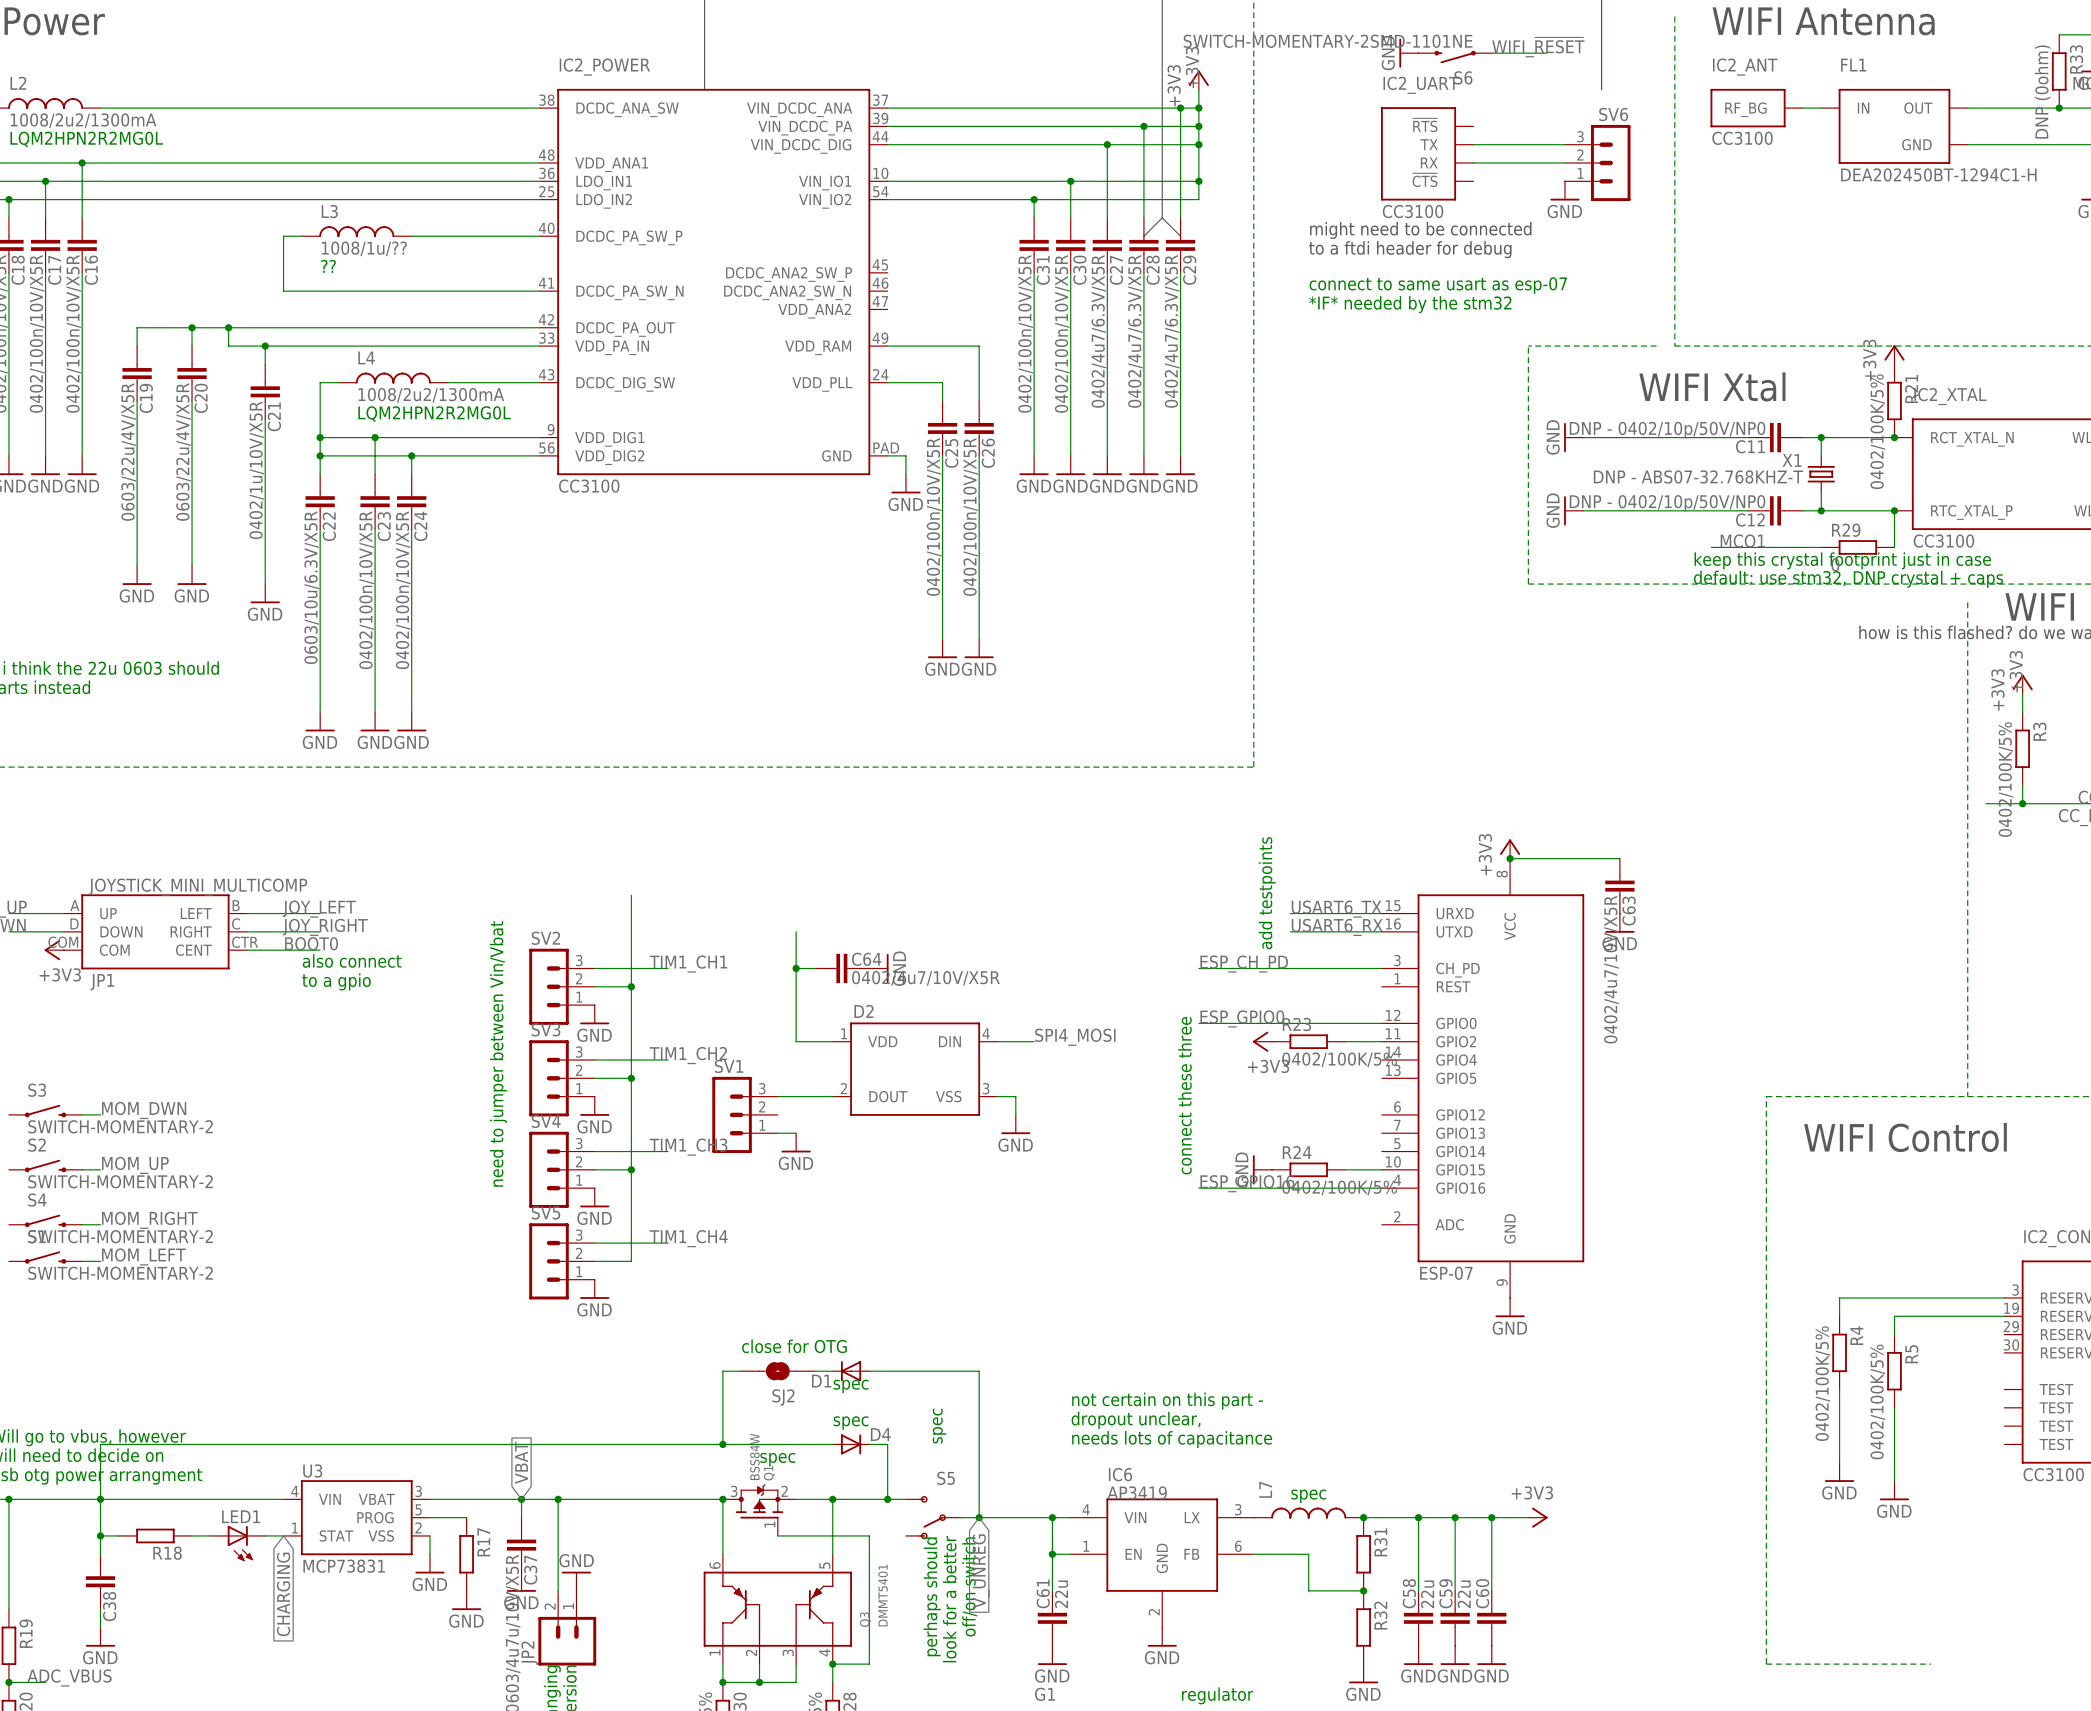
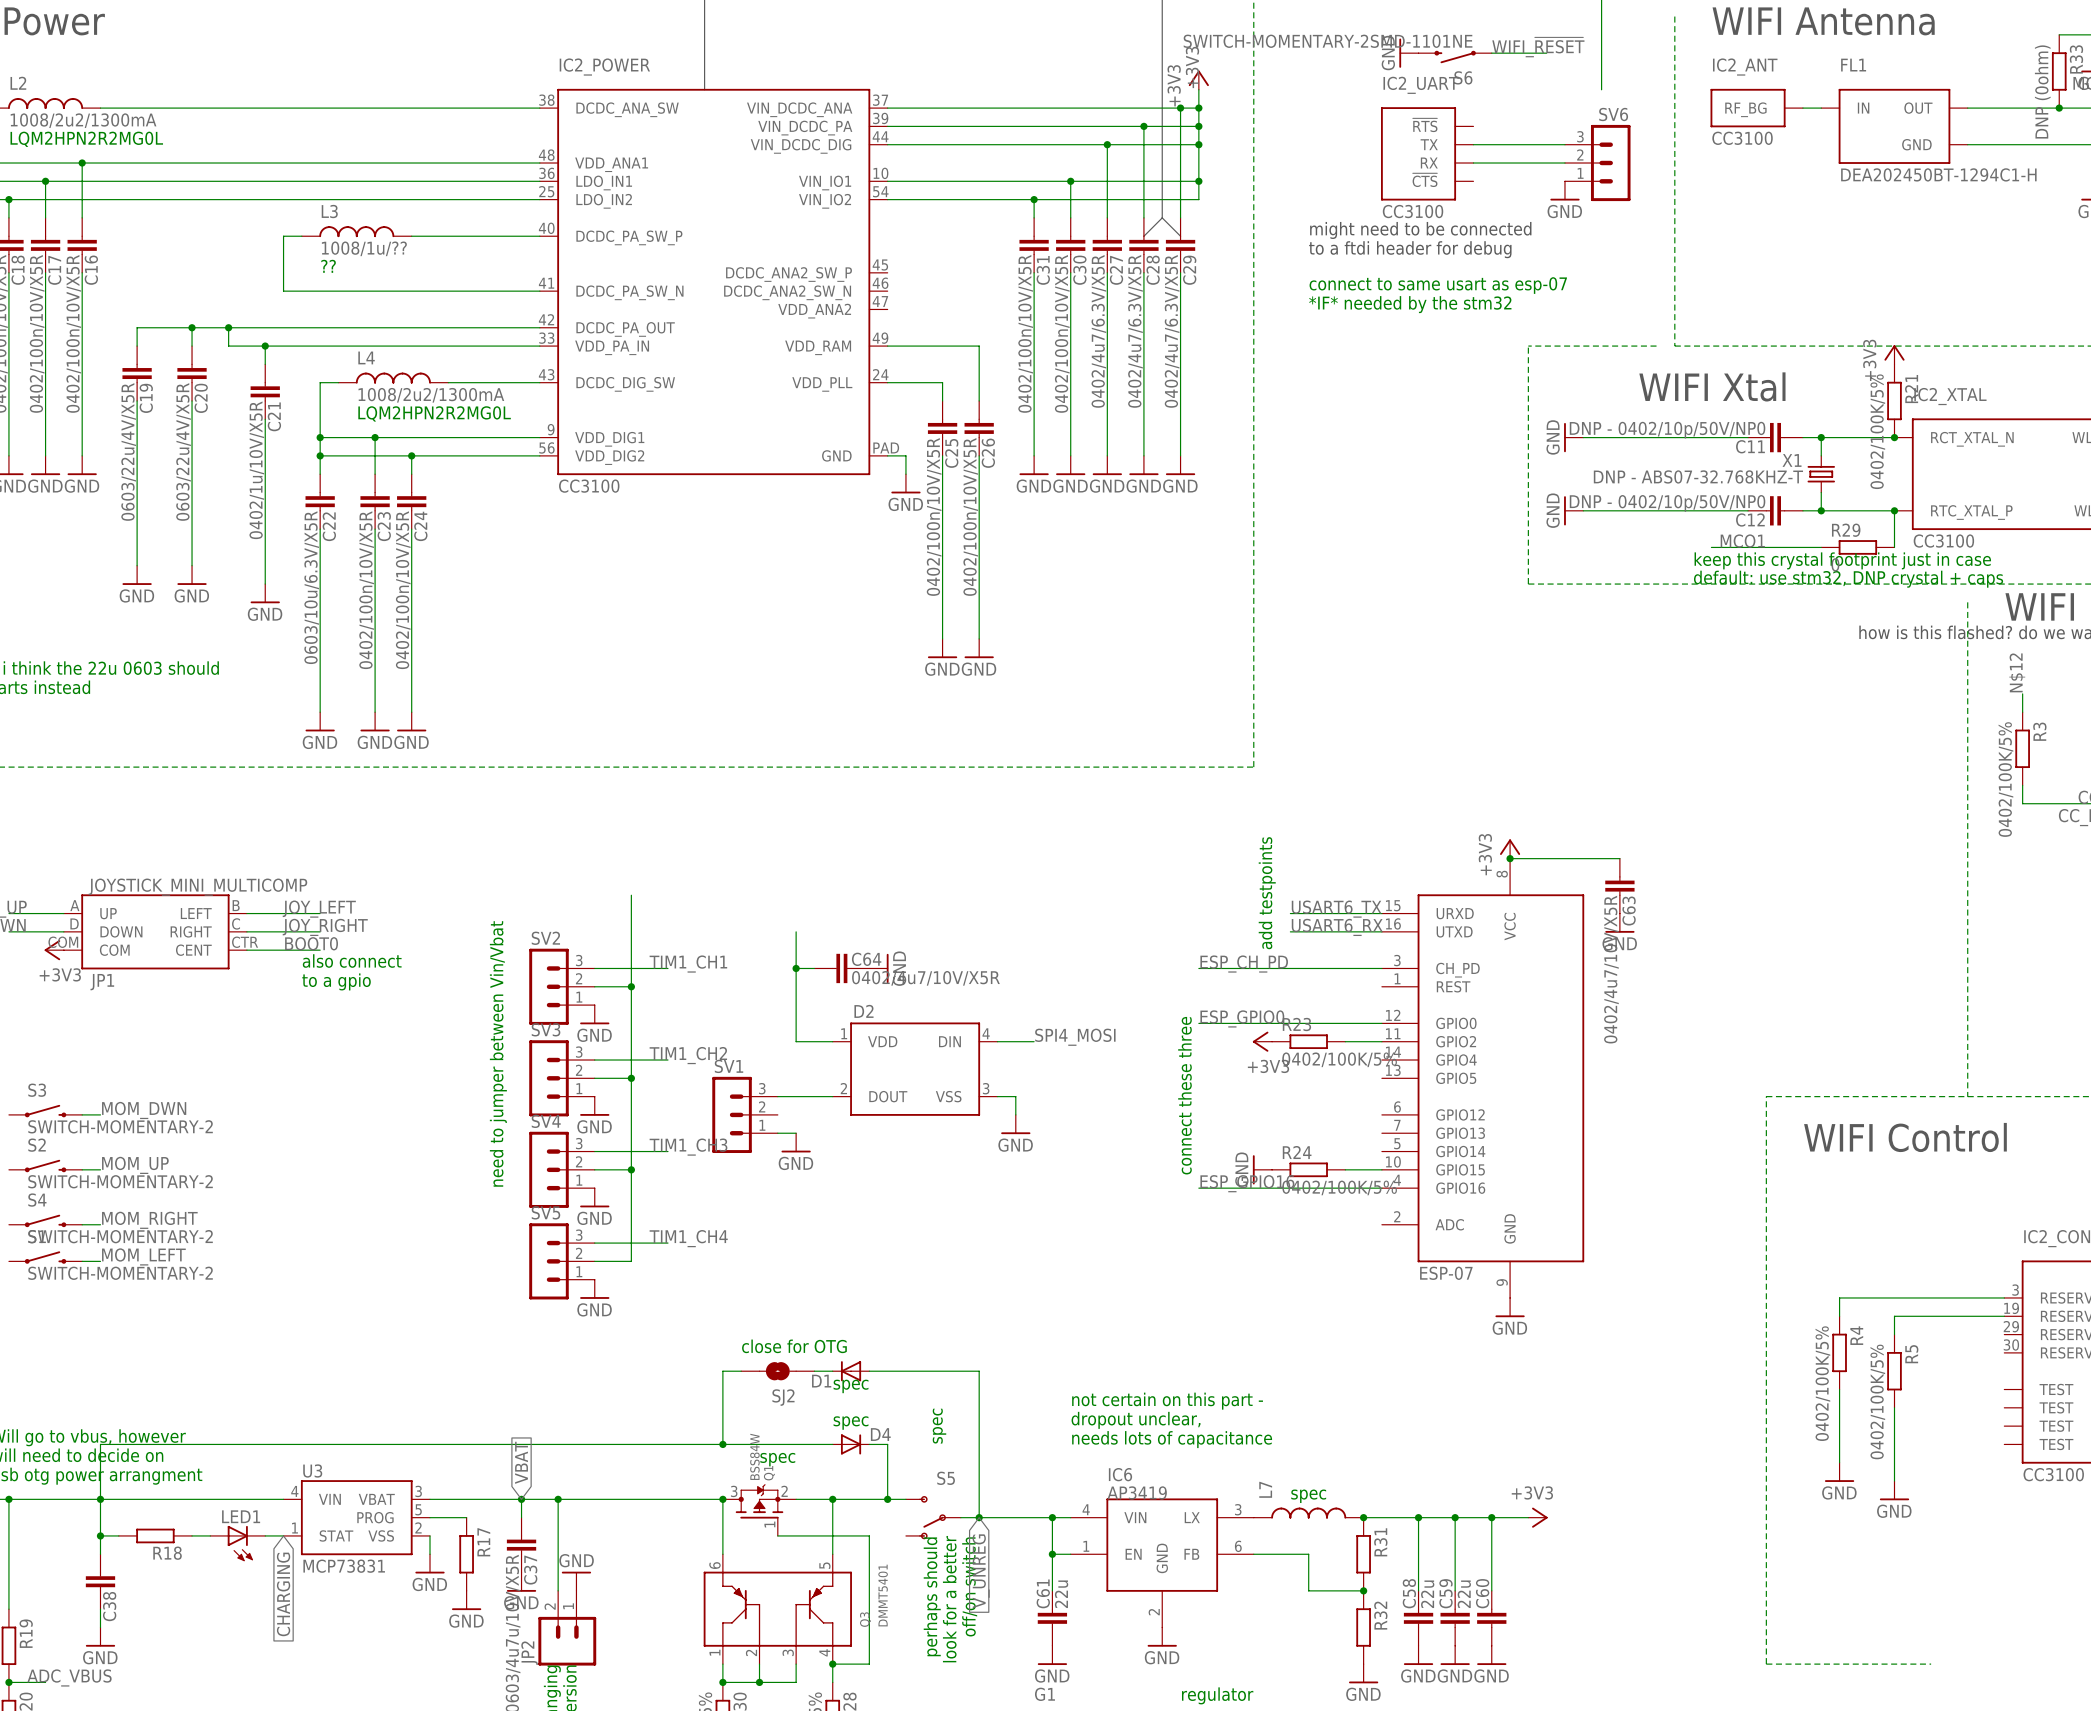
label: +3V3 (2016, 671) -> N$12 (2017, 672)
power symbol: +3V3 (2022, 684) -> none
wire: (1986, 803) (2022, 803) -> none
junction: (2022, 803) -> none

